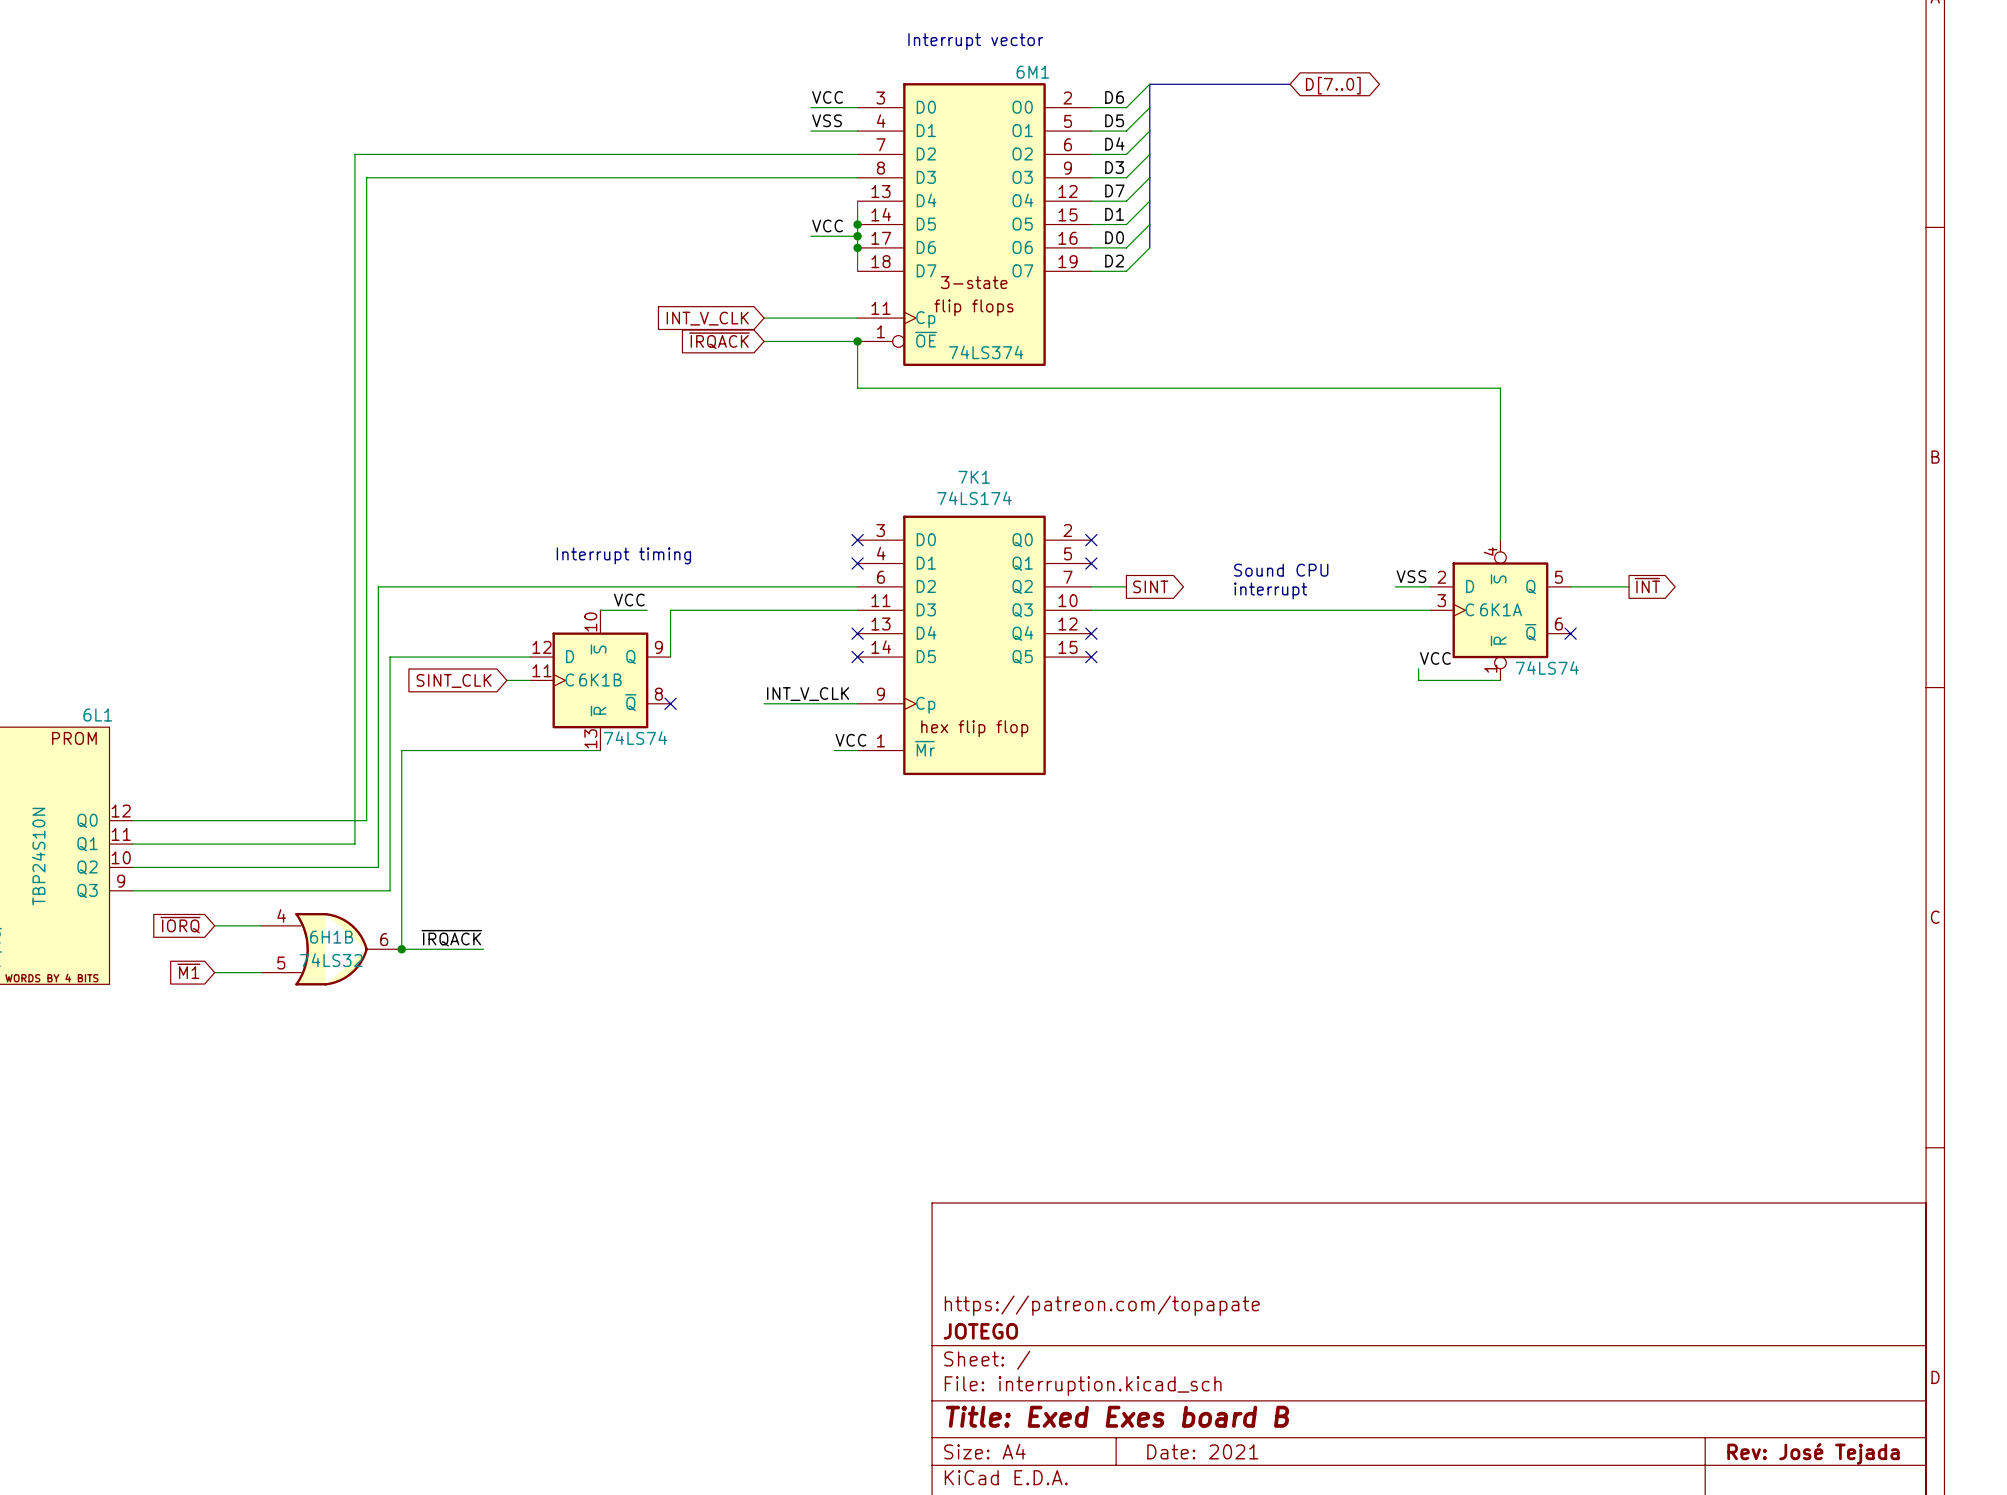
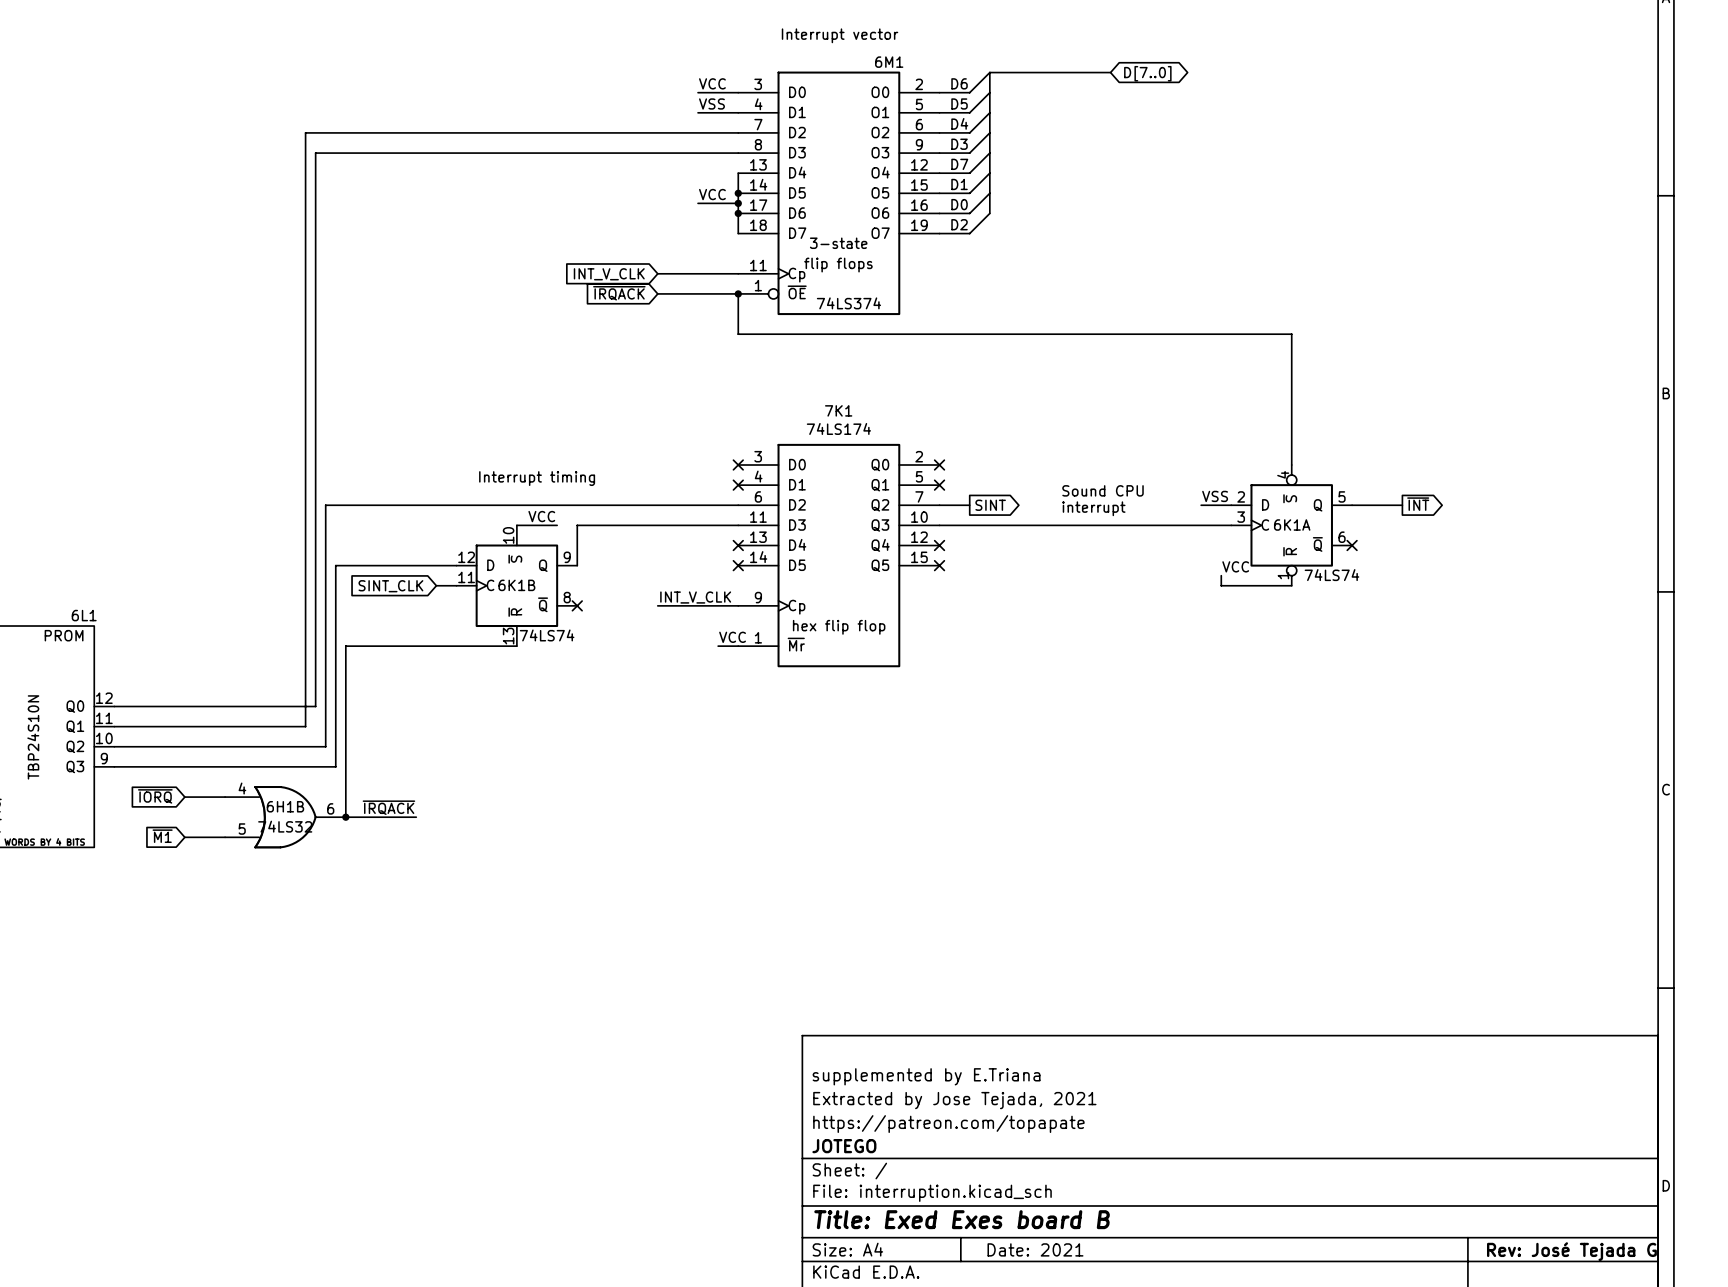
title block: none -> supplemented by E.Triana (926, 1076)
title block: none -> Extracted by Jose Tejada, 2021 (954, 1100)
title block: Rev: José Tejada (1813, 1453) -> Rev: José Tejada G (1571, 1251)

